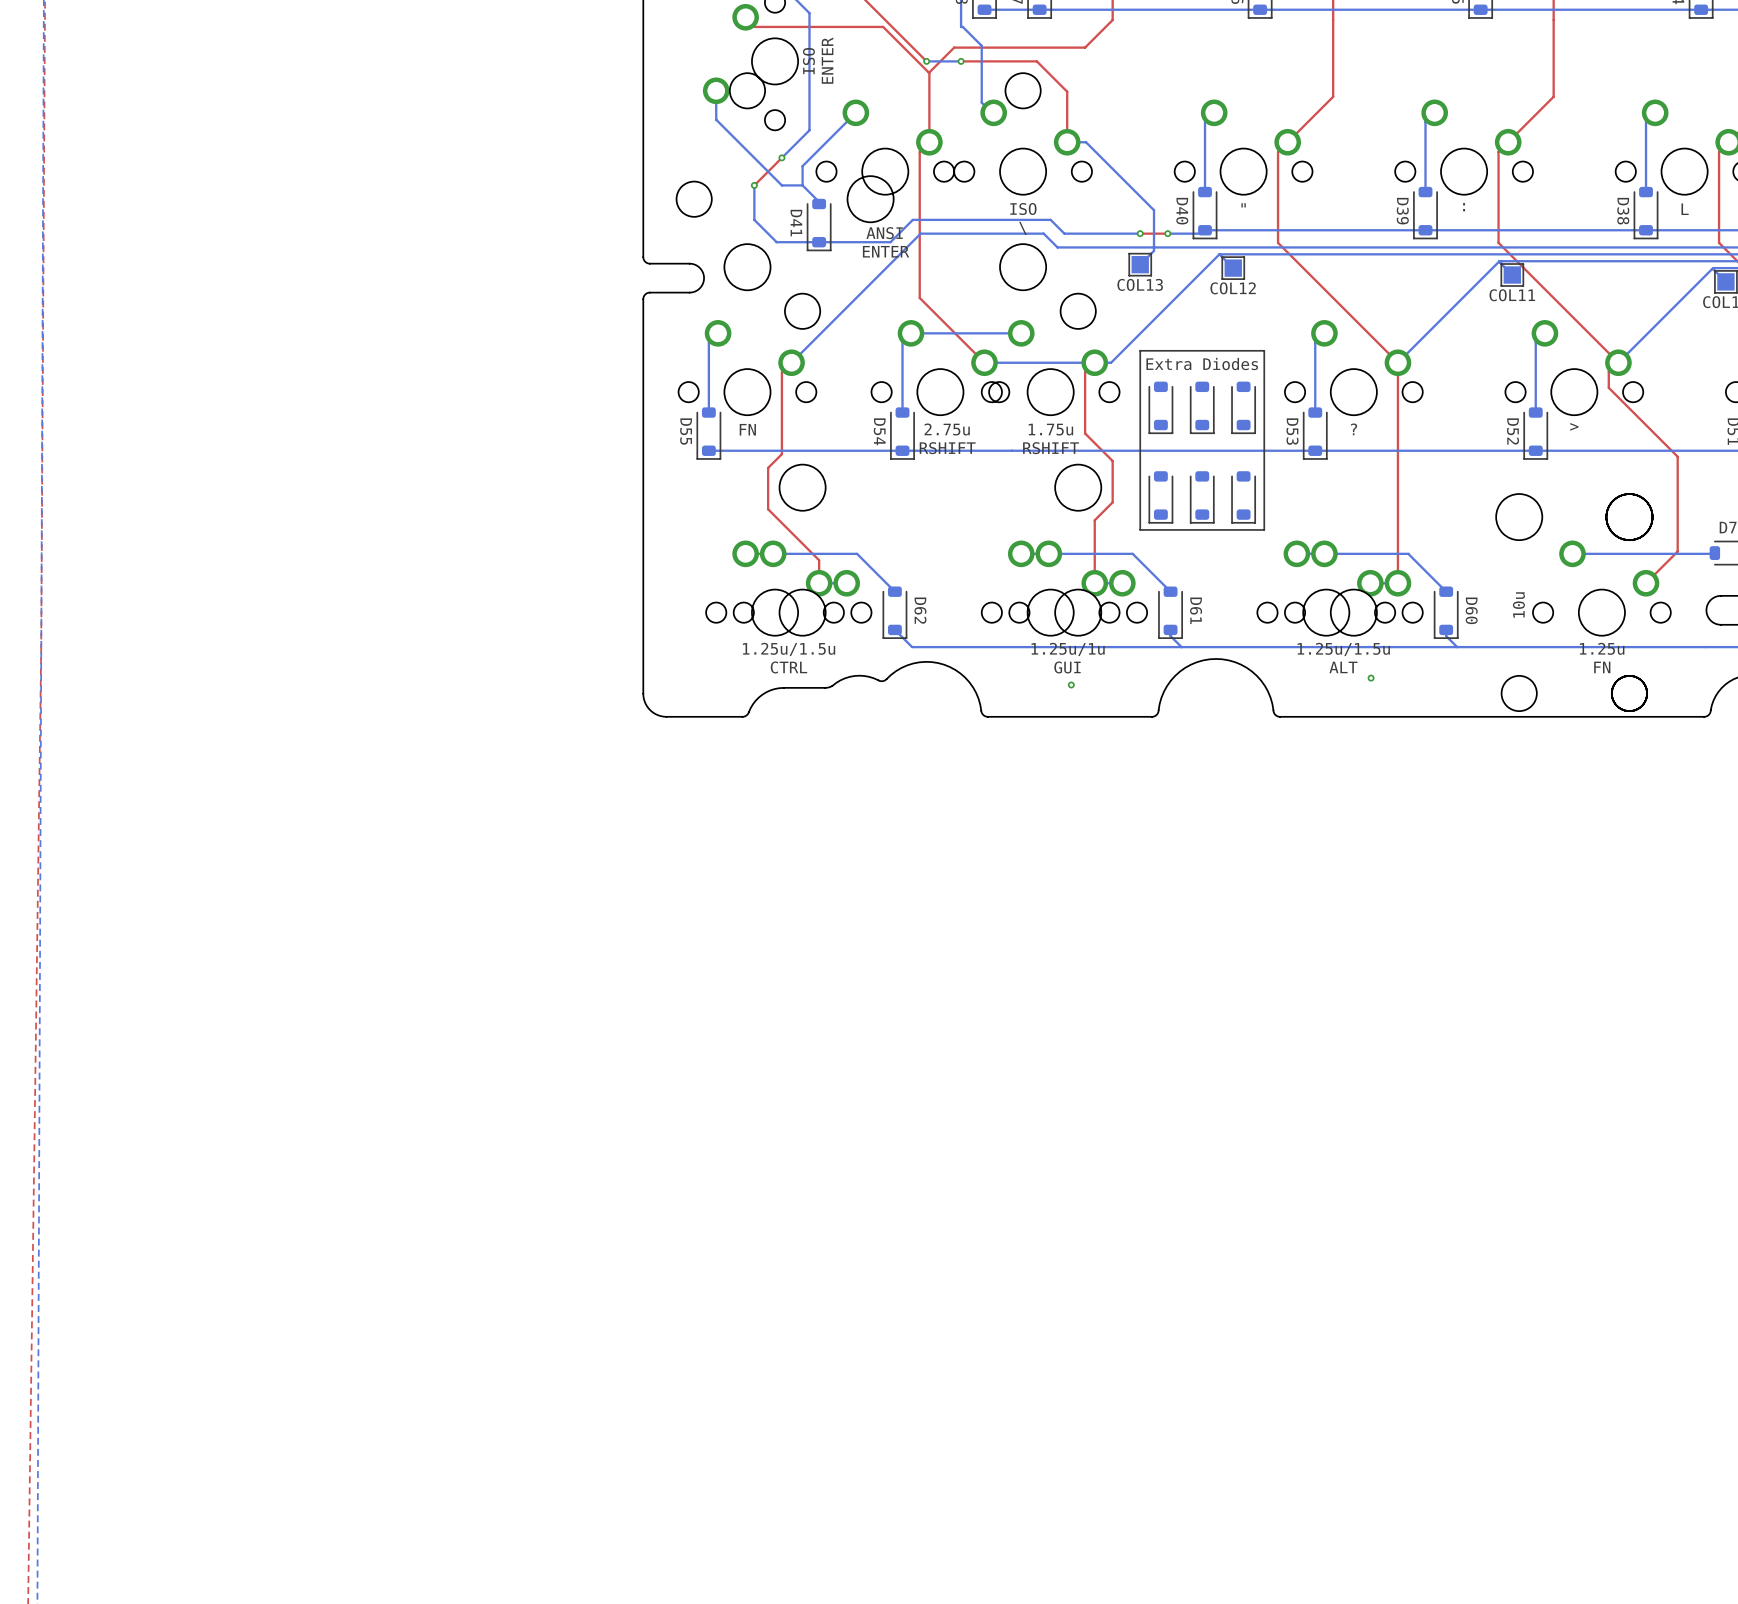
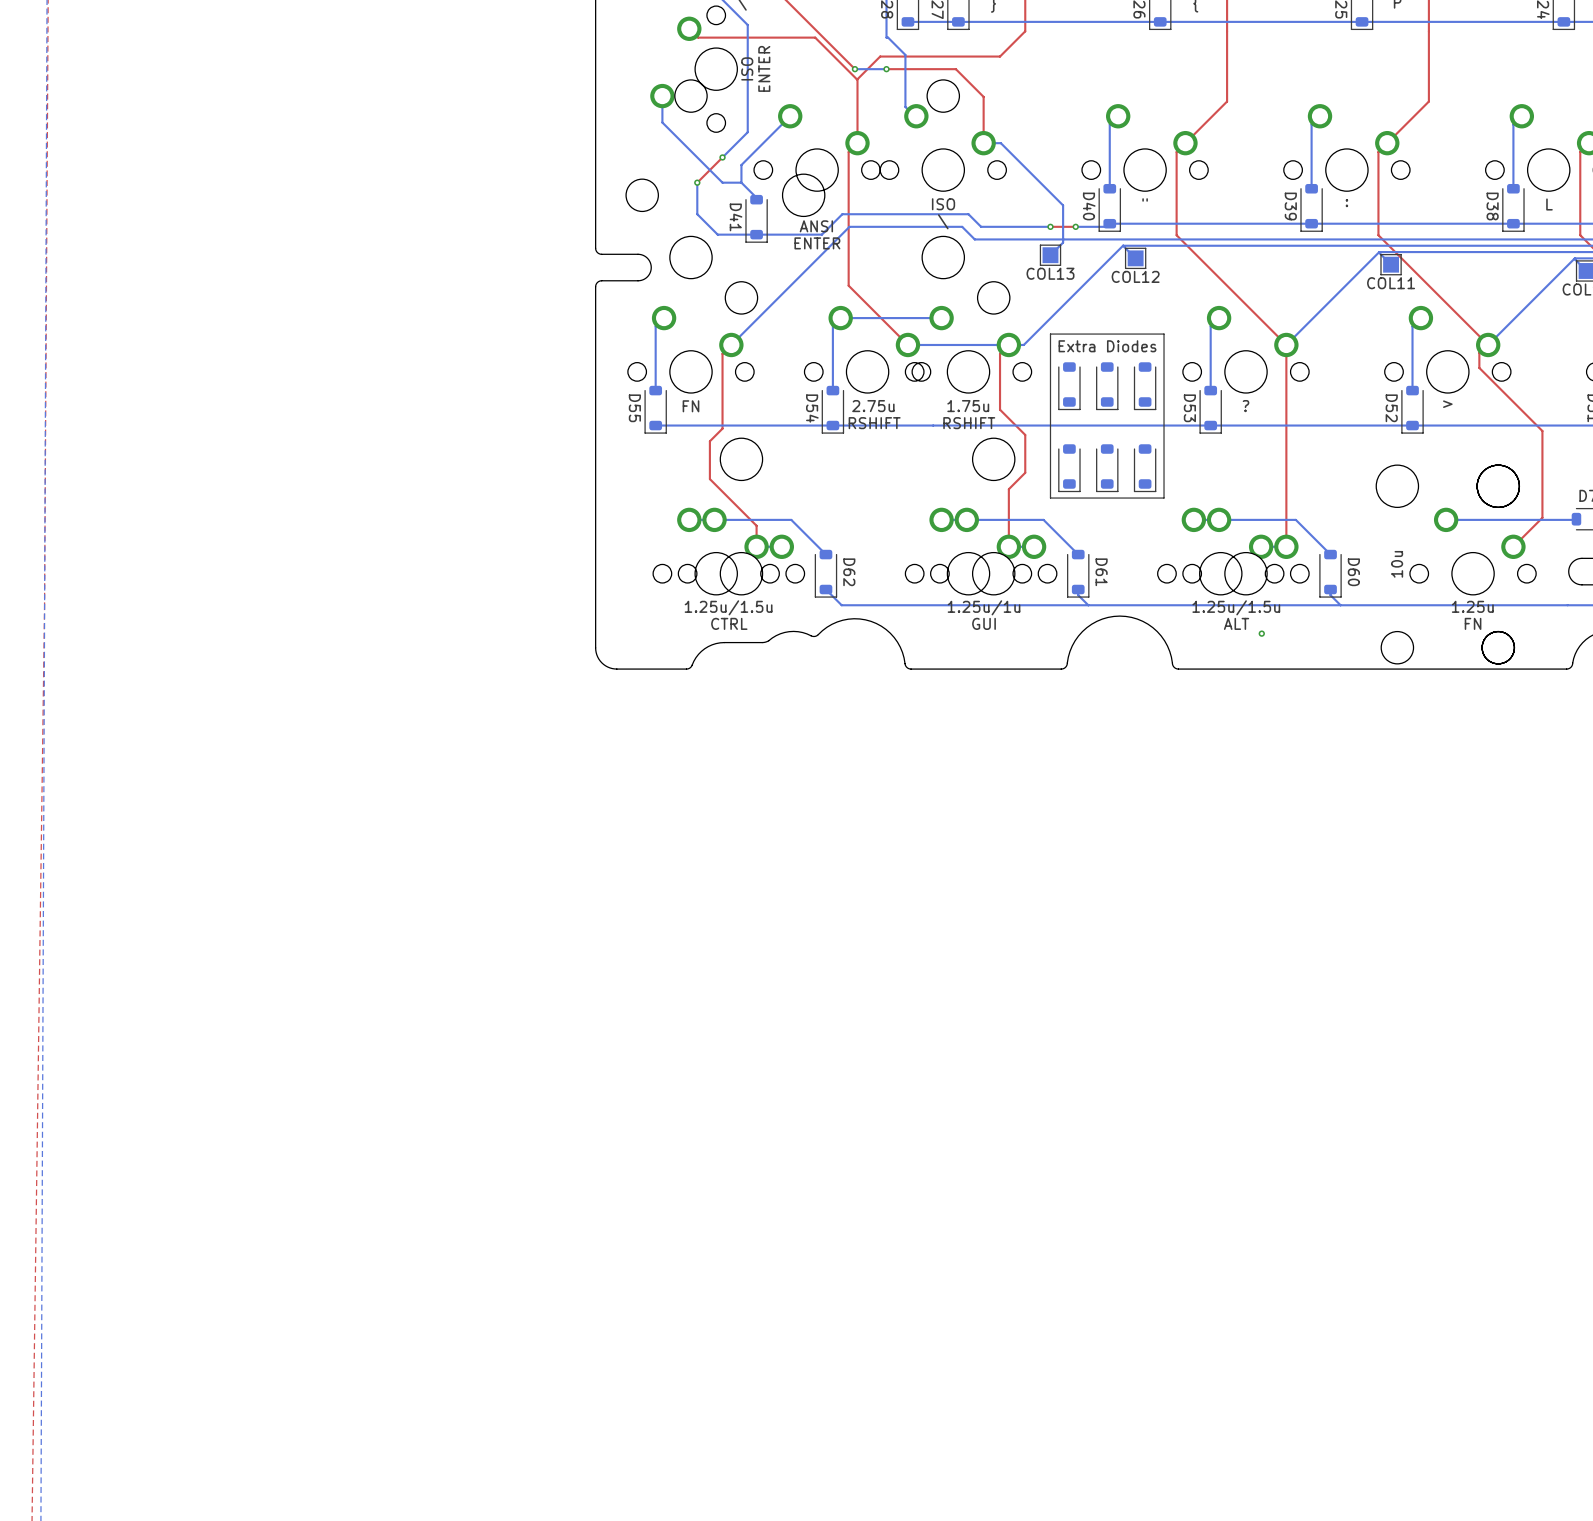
via: (1071, 684) -> none

